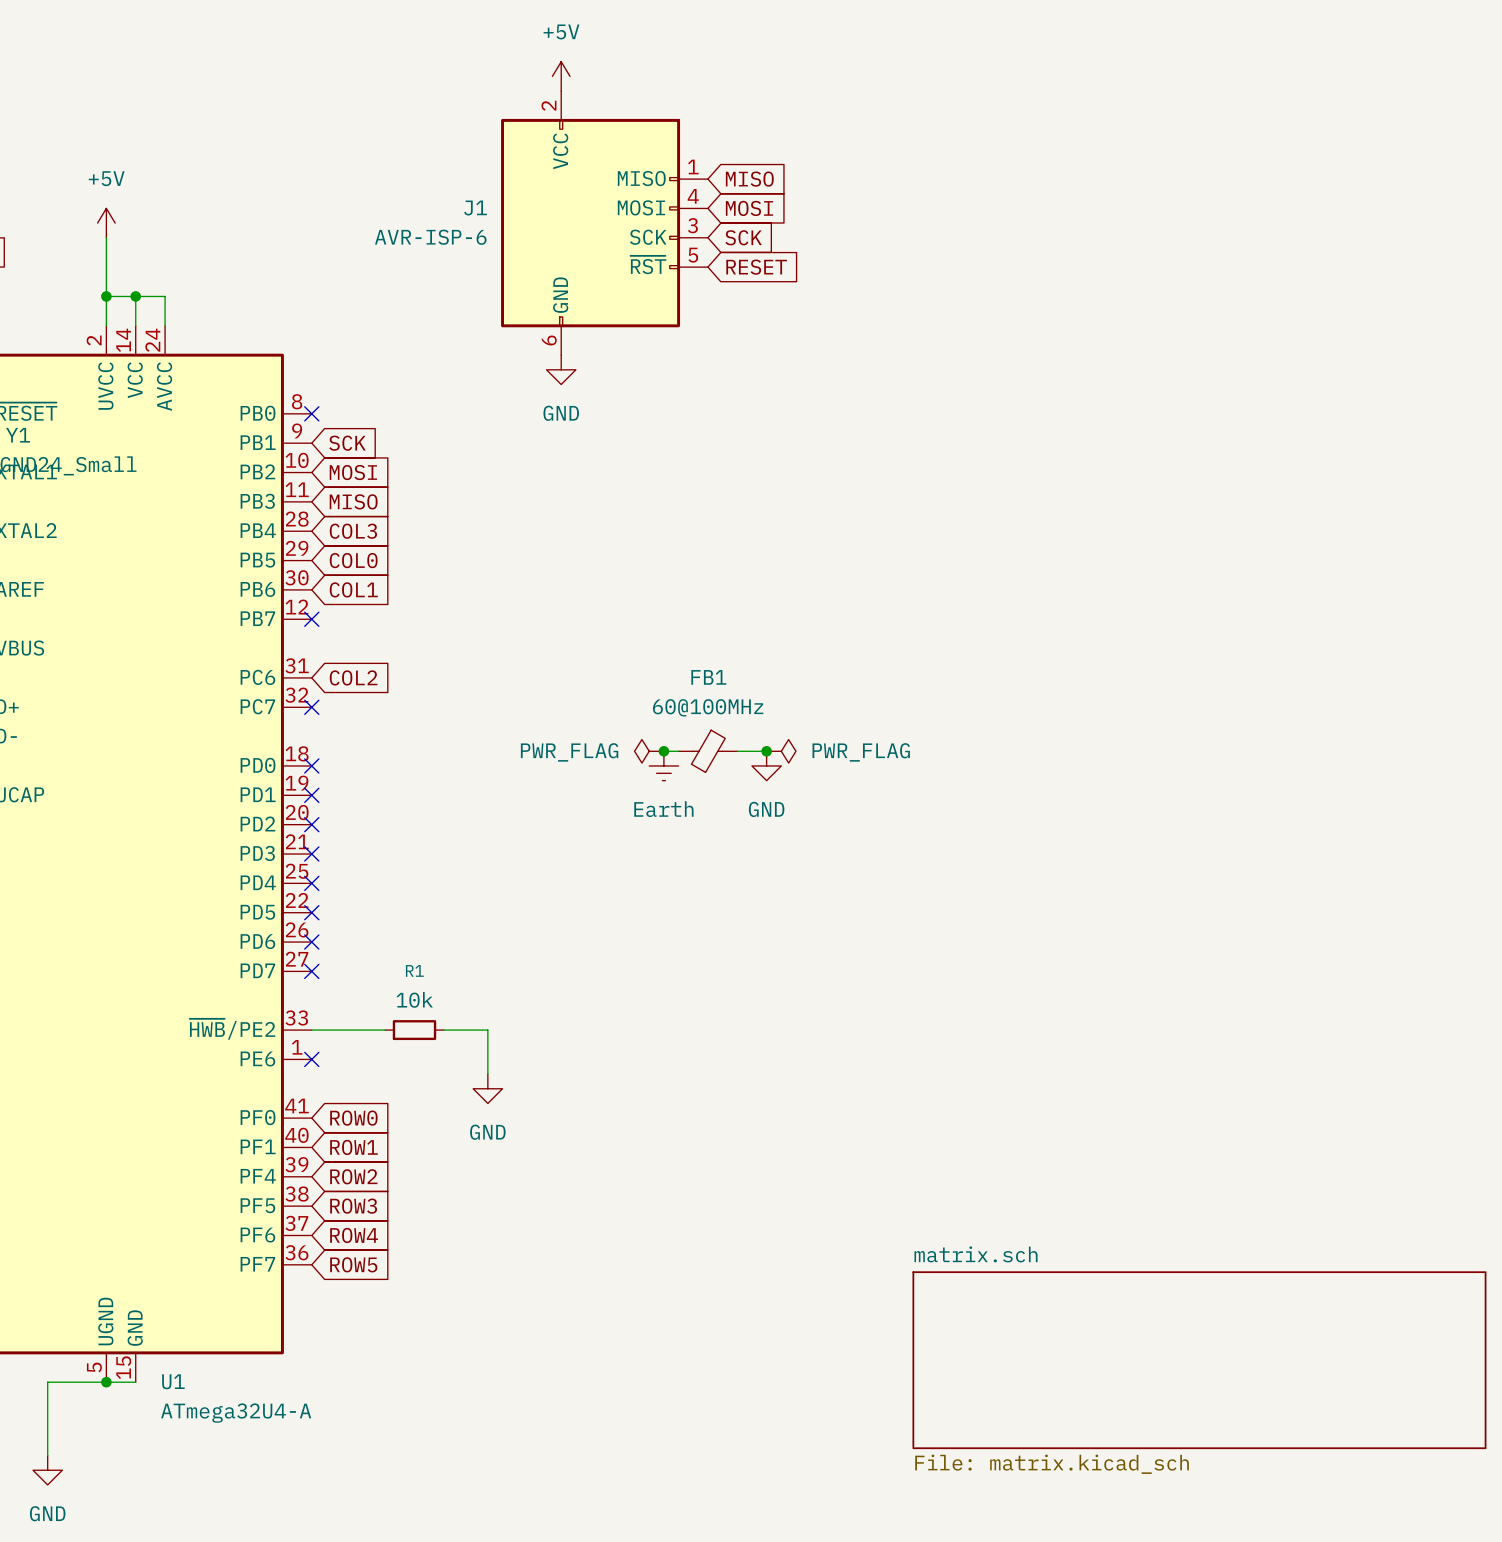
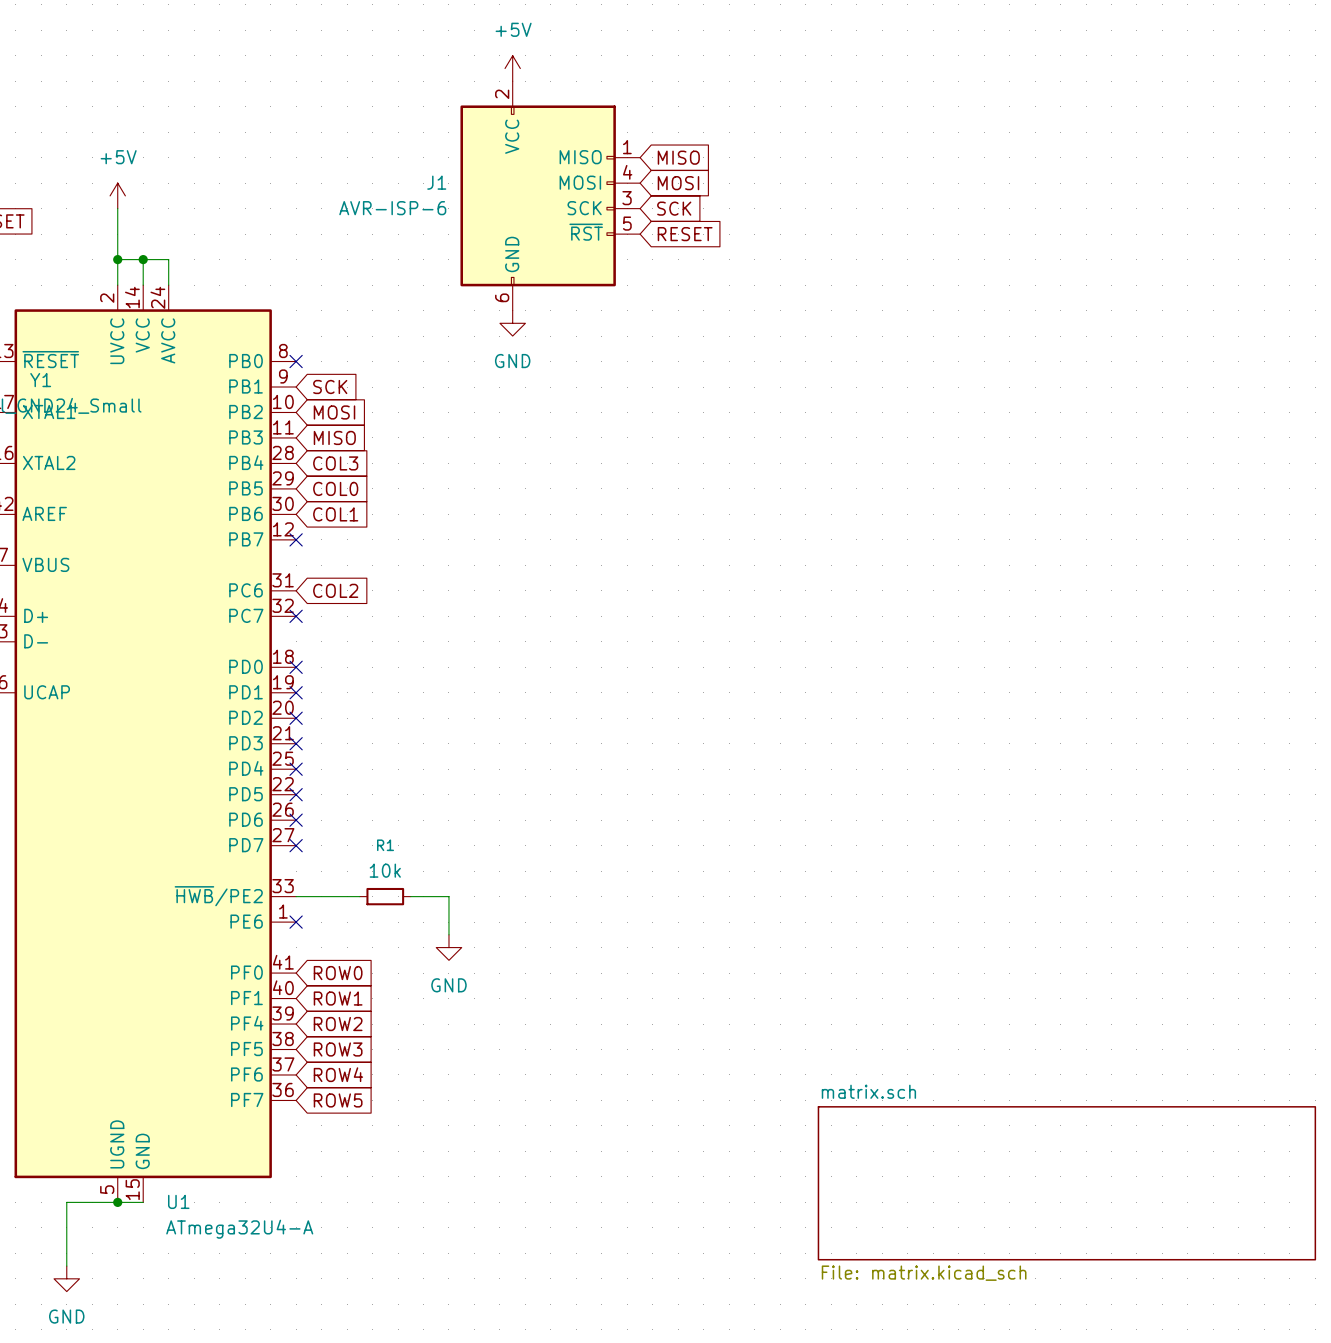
power symbol: PWR_FLAG (649, 751) -> none
wire: (663, 751) (678, 751) -> none
junction: (663, 751) -> none
FB1: 60@100MHz (707, 751) -> none
wire: (737, 751) (766, 751) -> none
junction: (766, 751) -> none
power symbol: PWR_FLAG (781, 751) -> none
power symbol: Earth (663, 765) -> none
power symbol: GND (766, 765) -> none

